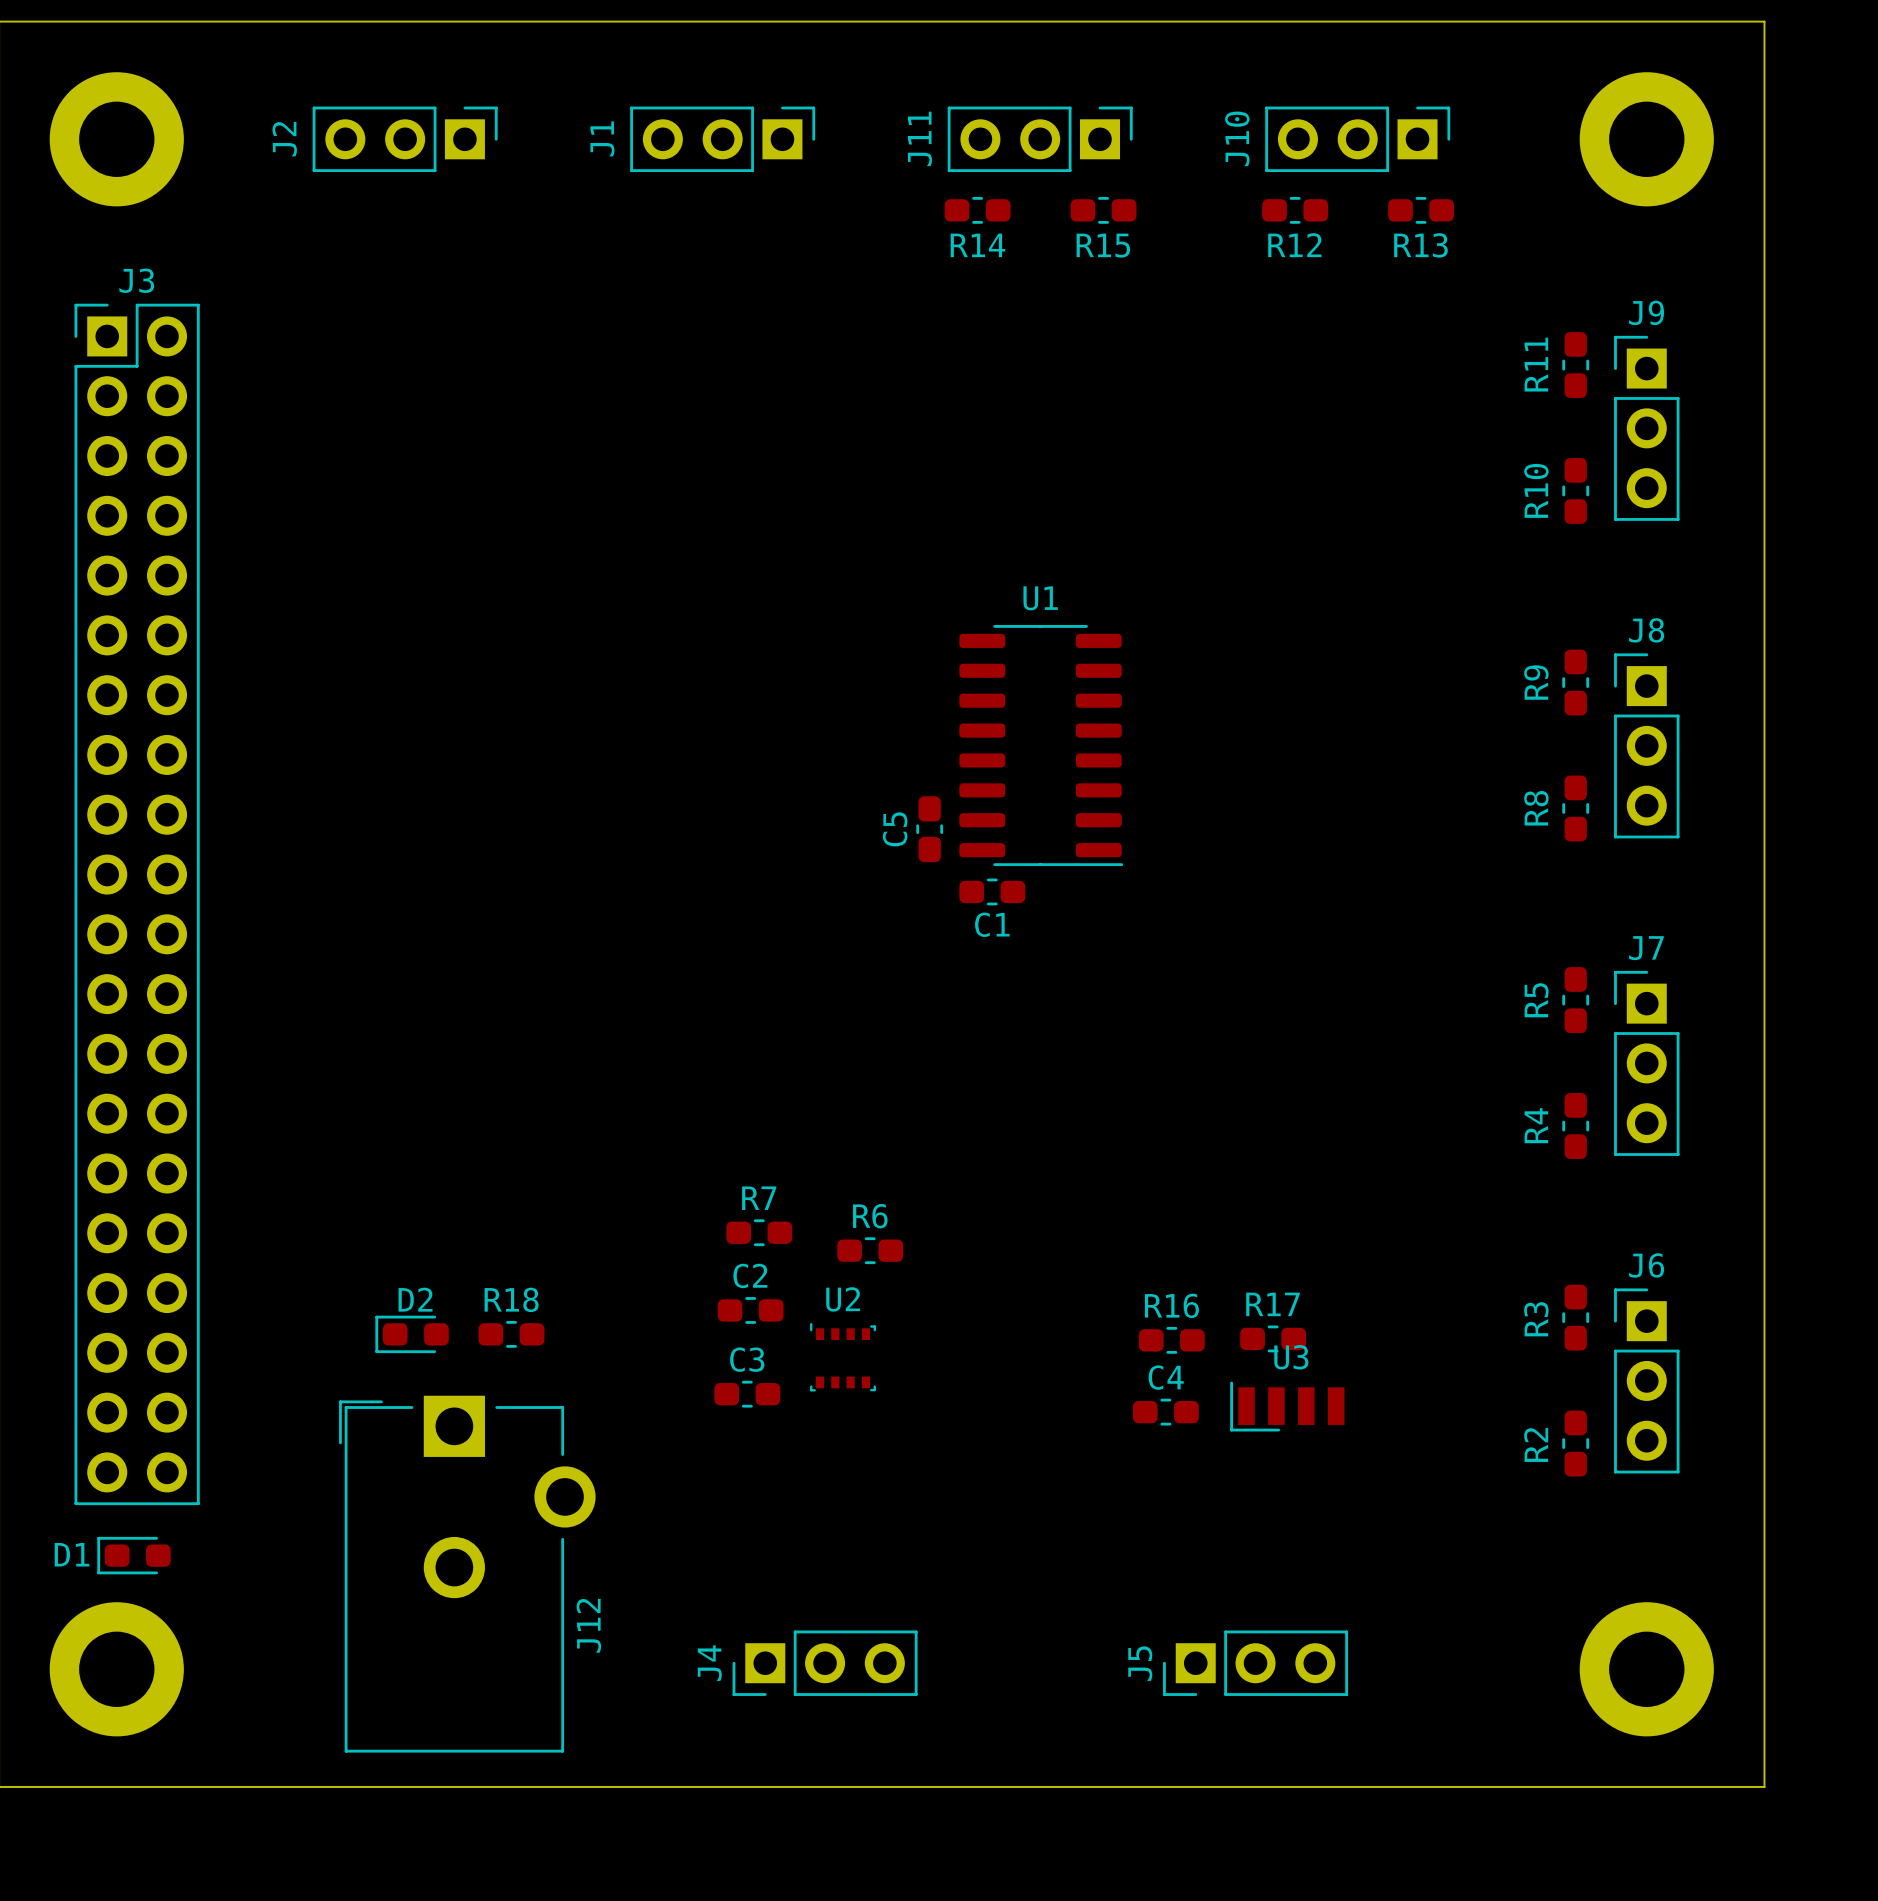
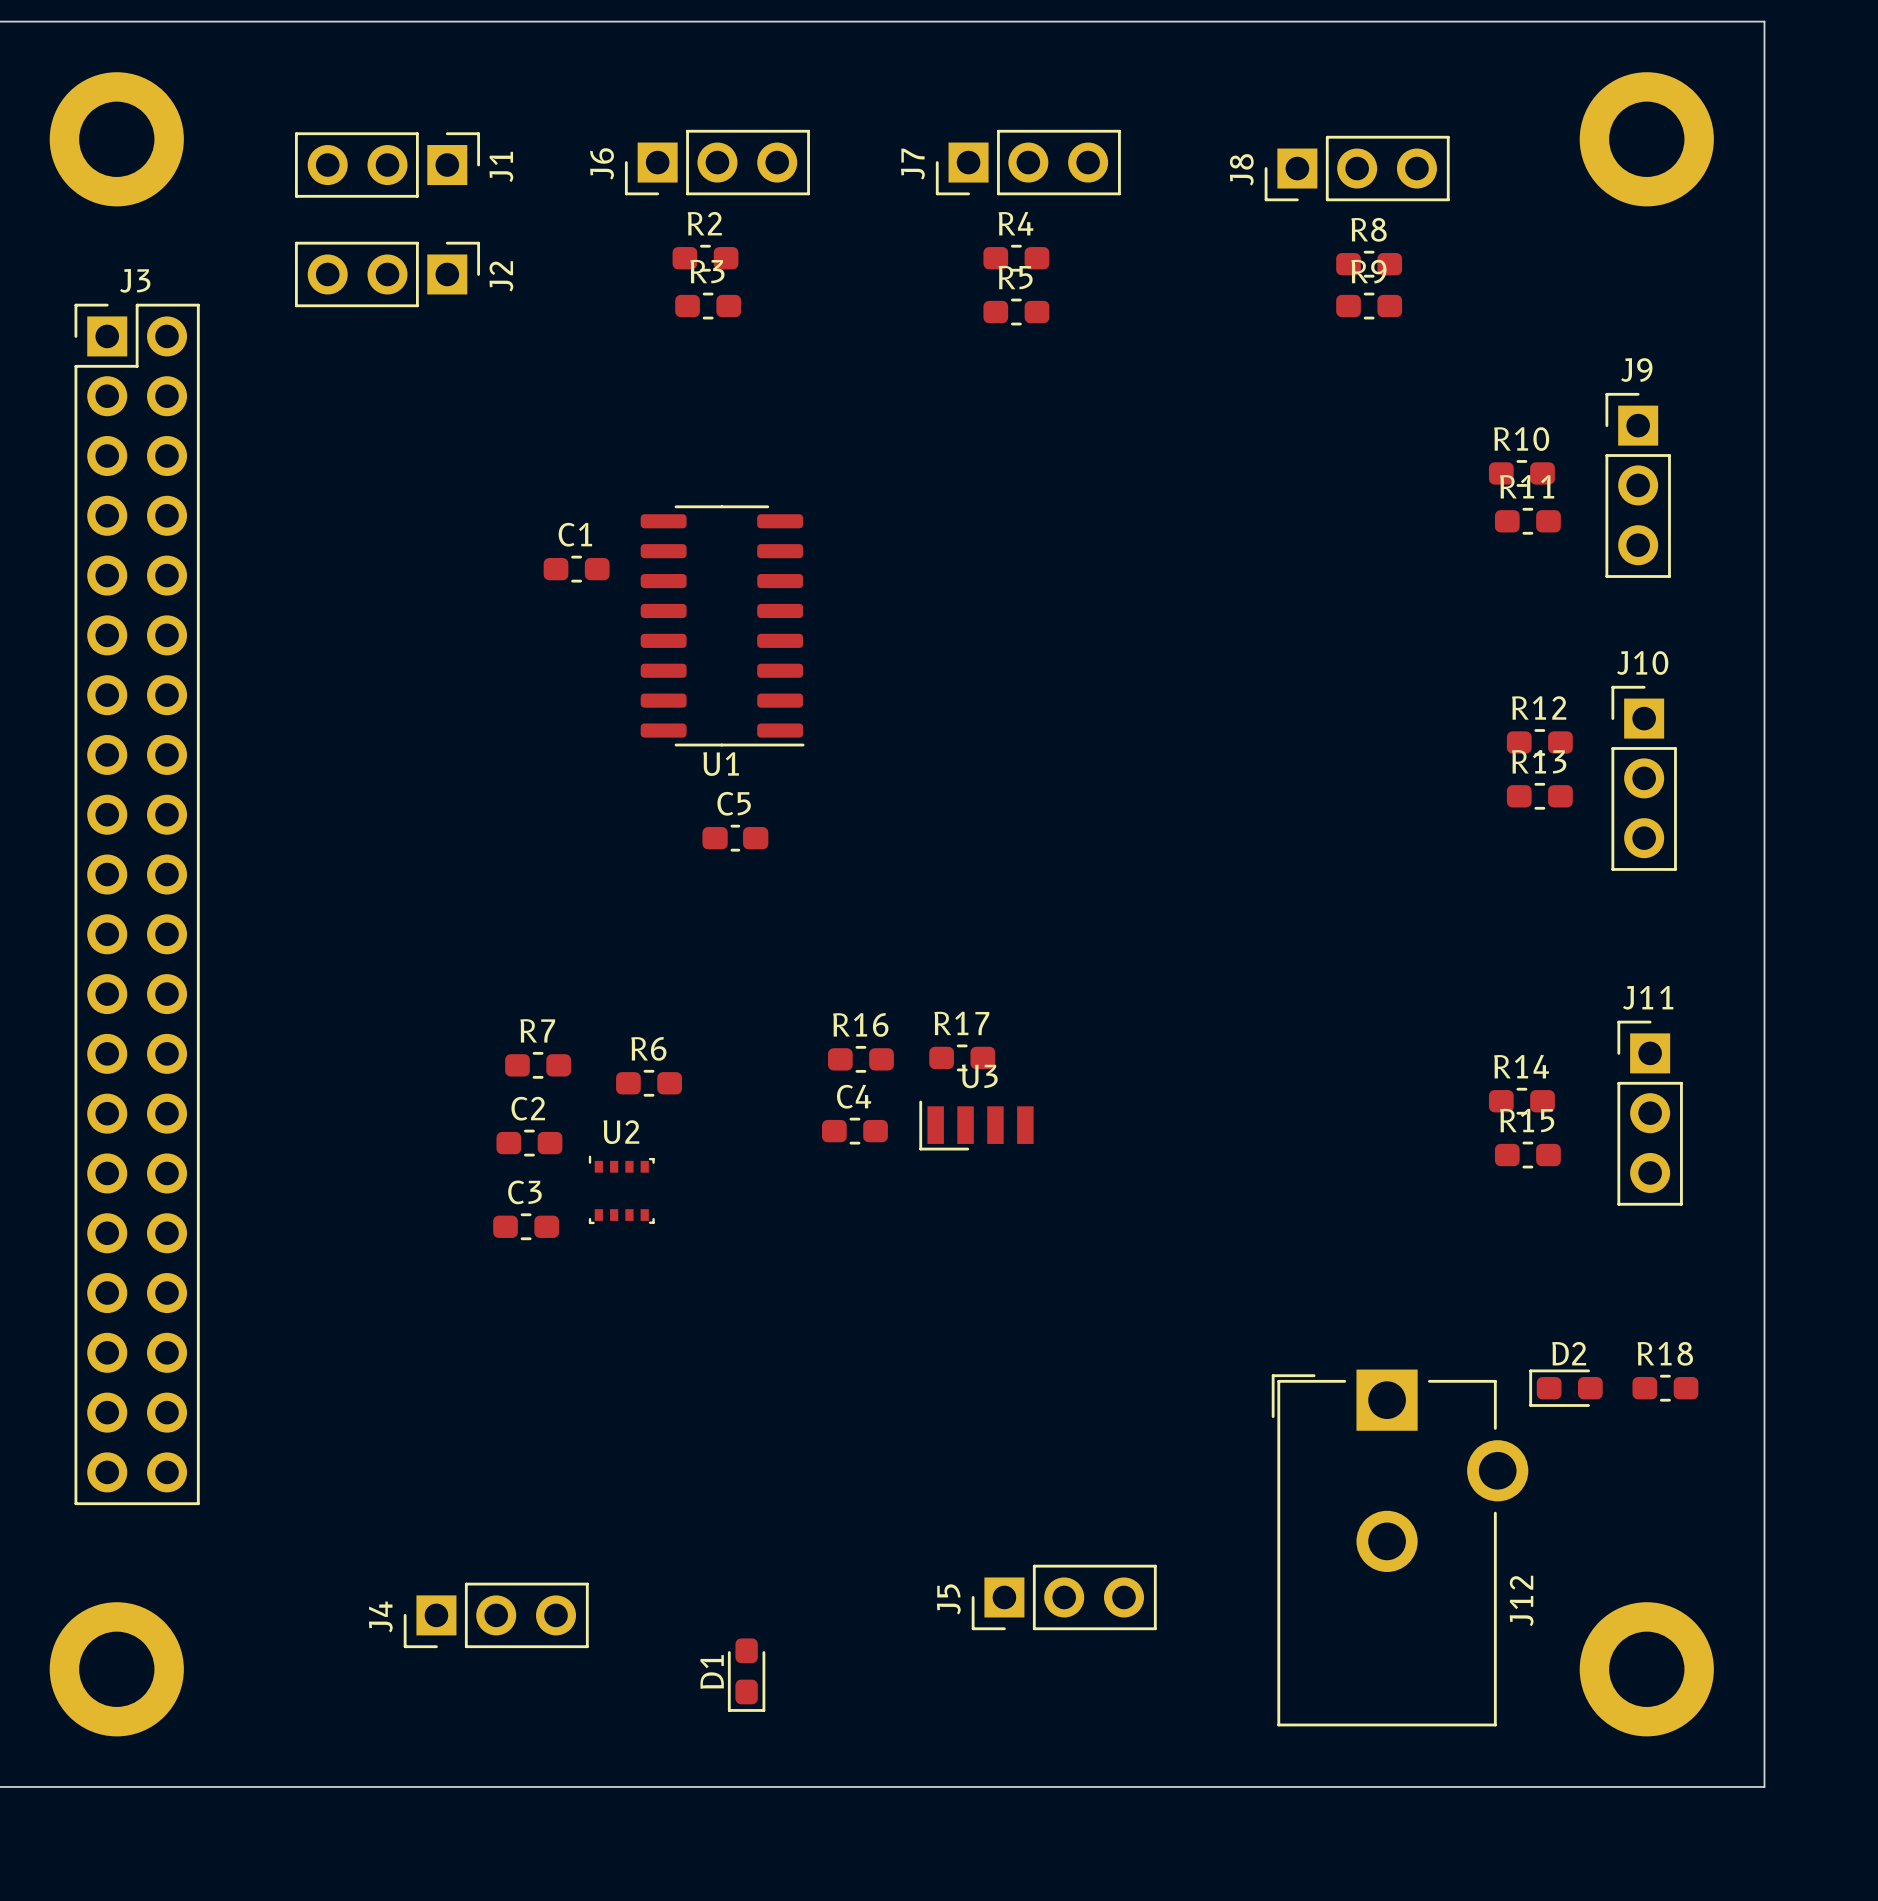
J1 name position: J1 (602, 138) -> J1 (501, 166)
J11 name position: J11 (919, 138) -> J11 (1648, 997)
J10 name position: J10 (1237, 138) -> J10 (1642, 662)
J2 name position: J2 (284, 139) -> J2 (501, 276)
J2 position: (405, 139) -> (387, 274)
J1 position: (722, 139) -> (387, 165)
J11 rotation: 0° (1040, 139) -> 90° counterclockwise (1650, 1113)
J11 position: (1040, 139) -> (1650, 1113)
J10 rotation: 0° (1357, 139) -> 90° counterclockwise (1644, 778)
J10 position: (1357, 139) -> (1644, 778)
R14 position: (977, 210) -> (1521, 1101)
R15 position: (1103, 210) -> (1527, 1155)
R12 position: (1295, 210) -> (1539, 742)
R13 position: (1421, 210) -> (1539, 796)
R14 name position: R14 (977, 245) -> R14 (1521, 1066)
R15 name position: R15 (1103, 245) -> R15 (1527, 1120)
R12 name position: R12 (1294, 245) -> R12 (1539, 707)
R13 name position: R13 (1420, 245) -> R13 (1539, 761)
R11 rotation: 0° (1575, 365) -> 90° clockwise (1527, 521)
R11 position: (1575, 365) -> (1527, 521)
J9 position: (1646, 428) -> (1638, 485)
R10 rotation: 0° (1575, 490) -> 90° clockwise (1521, 473)
R10 position: (1575, 490) -> (1521, 473)
U1 name position: U1 (1040, 598) -> U1 (721, 764)
R9 rotation: 0° (1575, 682) -> 90° clockwise (1369, 306)
R9 position: (1575, 682) -> (1369, 306)
U1 position: (1041, 745) -> (722, 625)
J8 rotation: 0° (1646, 745) -> 90° counterclockwise (1357, 168)
J8 position: (1646, 745) -> (1357, 168)
R8 rotation: 0° (1575, 808) -> 90° clockwise (1369, 264)
R8 position: (1575, 808) -> (1369, 264)
C5 rotation: 0° (929, 829) -> 90° clockwise (735, 838)
C5 position: (929, 829) -> (735, 838)
C1 position: (992, 891) -> (576, 569)
C1 name position: C1 (992, 924) -> C1 (575, 534)
R5 rotation: 0° (1575, 1000) -> 90° clockwise (1016, 312)
R5 position: (1575, 1000) -> (1016, 312)
J7 rotation: 0° (1646, 1063) -> 90° counterclockwise (1028, 162)
J7 position: (1646, 1063) -> (1028, 162)
R4 rotation: 0° (1575, 1126) -> 90° clockwise (1016, 258)
R4 position: (1575, 1126) -> (1016, 258)
R7 position: (759, 1232) -> (538, 1065)
R6 position: (870, 1250) -> (649, 1083)
C2 position: (750, 1310) -> (529, 1143)
R3 rotation: 0° (1575, 1317) -> 90° clockwise (708, 306)
R3 position: (1575, 1317) -> (708, 306)
D2 position: (412, 1334) -> (1565, 1388)
R18 position: (511, 1334) -> (1665, 1388)
R17 position: (1273, 1338) -> (962, 1057)
R16 position: (1171, 1340) -> (860, 1059)
U2 position: (843, 1357) -> (621, 1189)
J6 rotation: 0° (1646, 1380) -> 90° counterclockwise (717, 162)
J6 position: (1646, 1380) -> (717, 162)
C3 position: (747, 1394) -> (526, 1226)
U3 position: (1287, 1406) -> (976, 1125)
C4 position: (1165, 1412) -> (854, 1131)
R2 rotation: 0° (1575, 1443) -> 90° clockwise (705, 258)
R2 position: (1575, 1443) -> (705, 258)
D1 rotation: 0° (134, 1555) -> 90° counterclockwise (746, 1675)
D1 position: (134, 1555) -> (746, 1675)
J12 position: (467, 1574) -> (1400, 1547)
J4 position: (825, 1663) -> (496, 1615)
J5 position: (1255, 1663) -> (1064, 1597)

